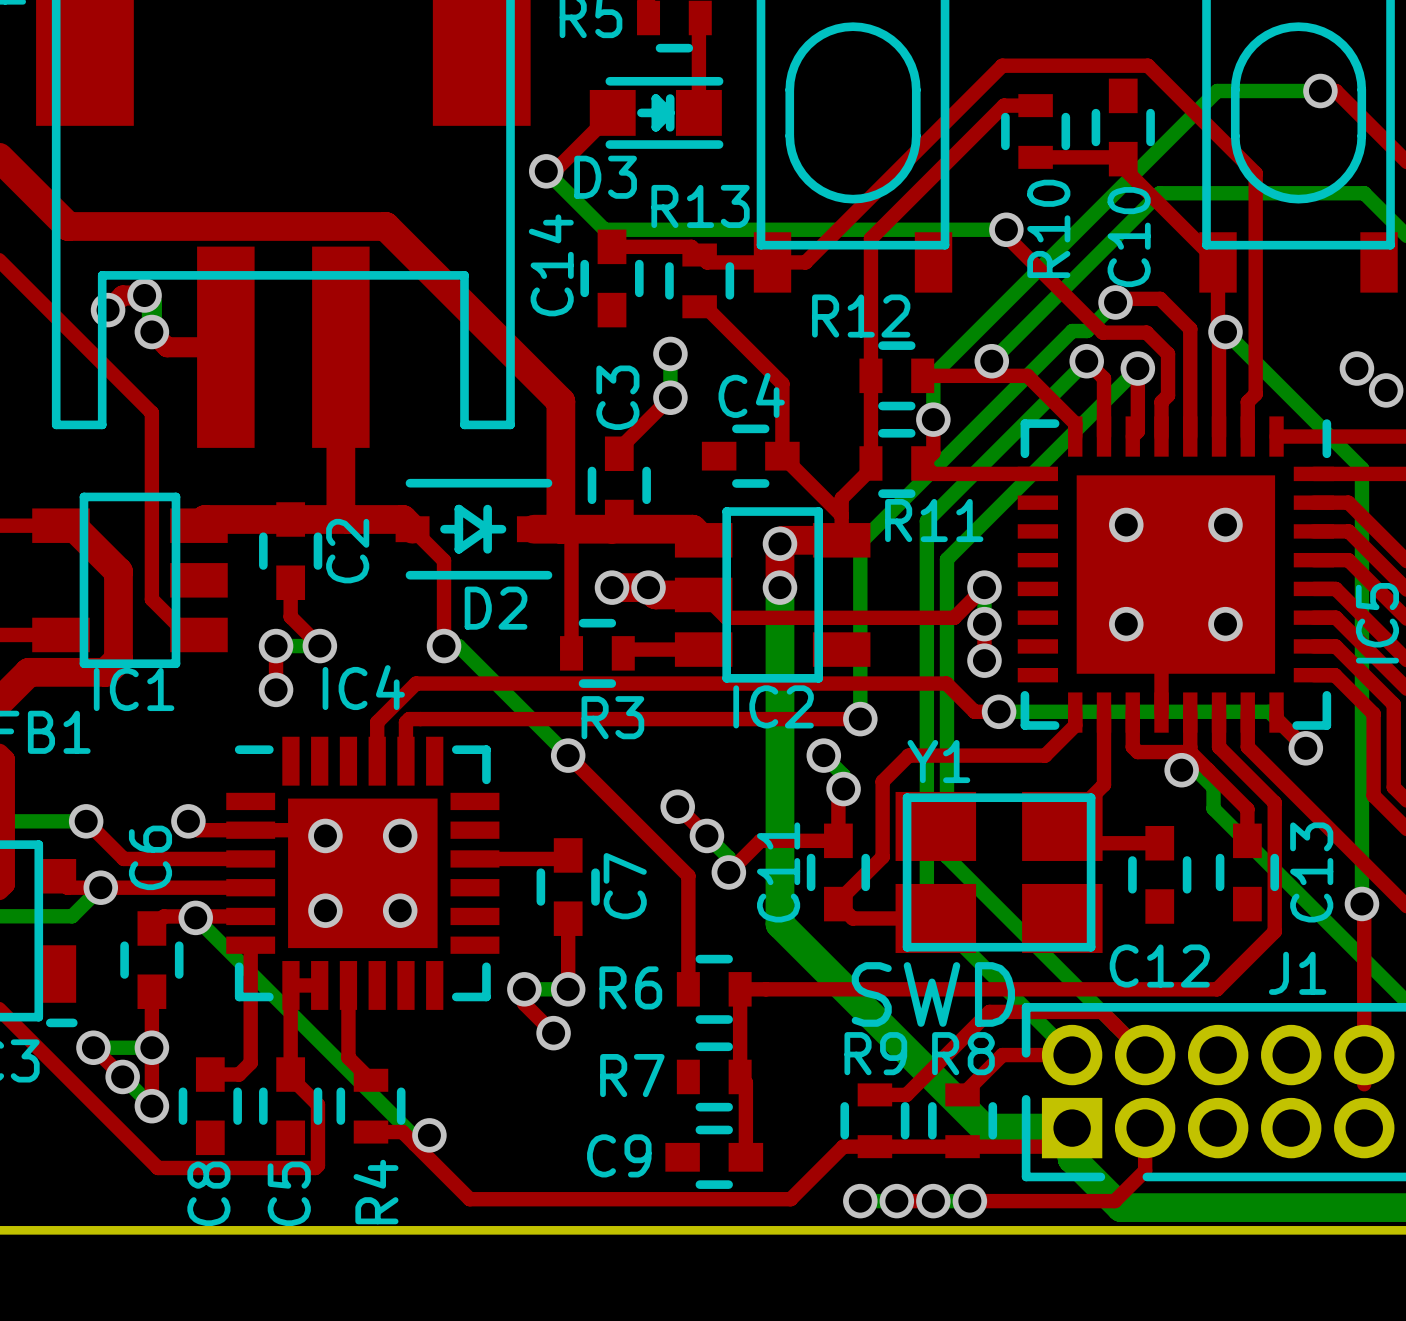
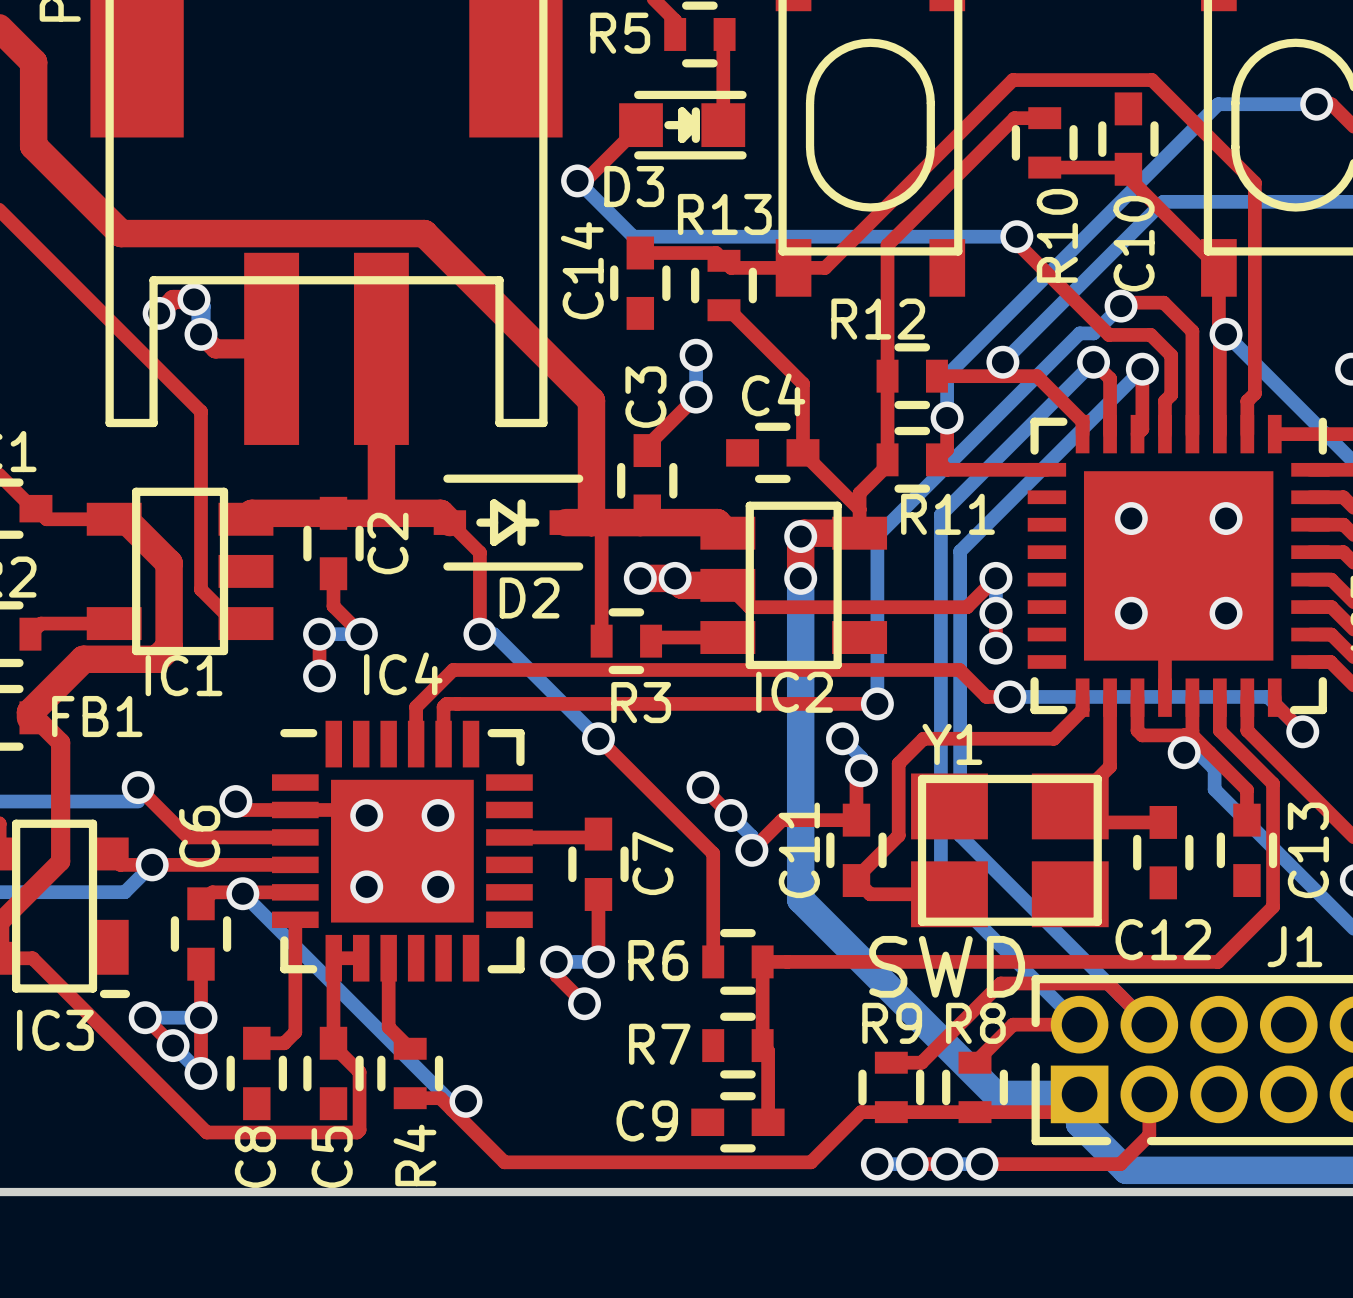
top track: (86, 821) (123, 858) (138, 858) -> (138, 787) (188, 837)
via position: (86, 821) -> (138, 787)

